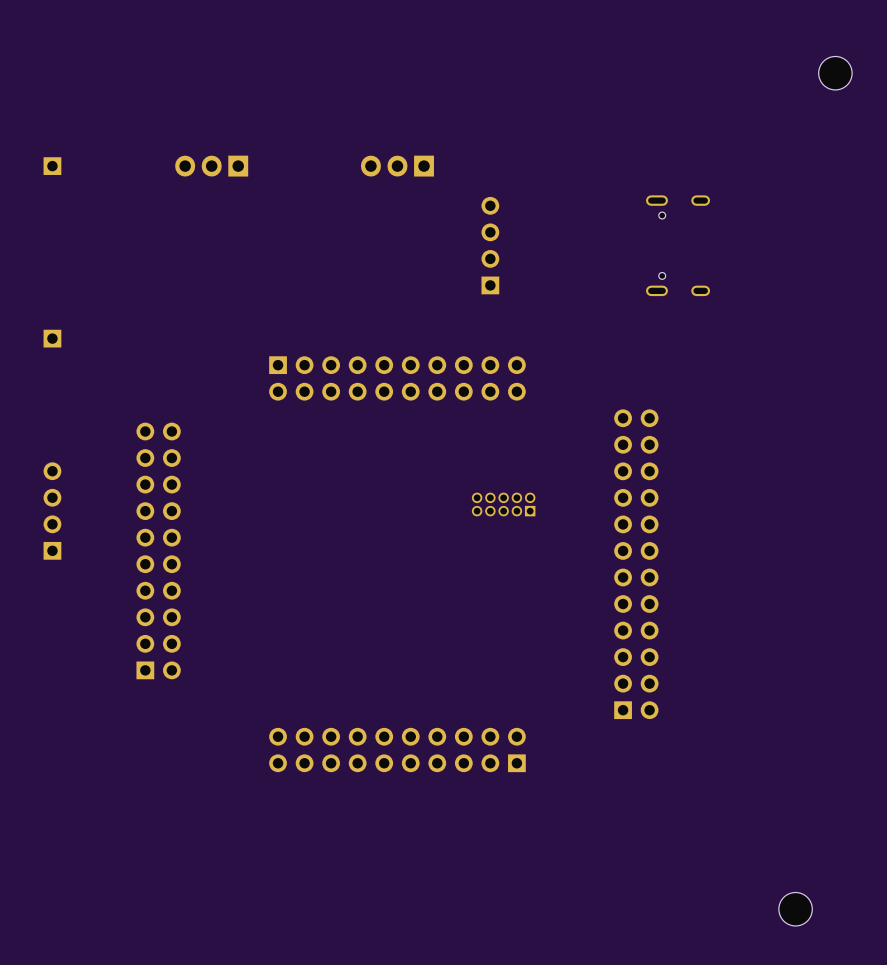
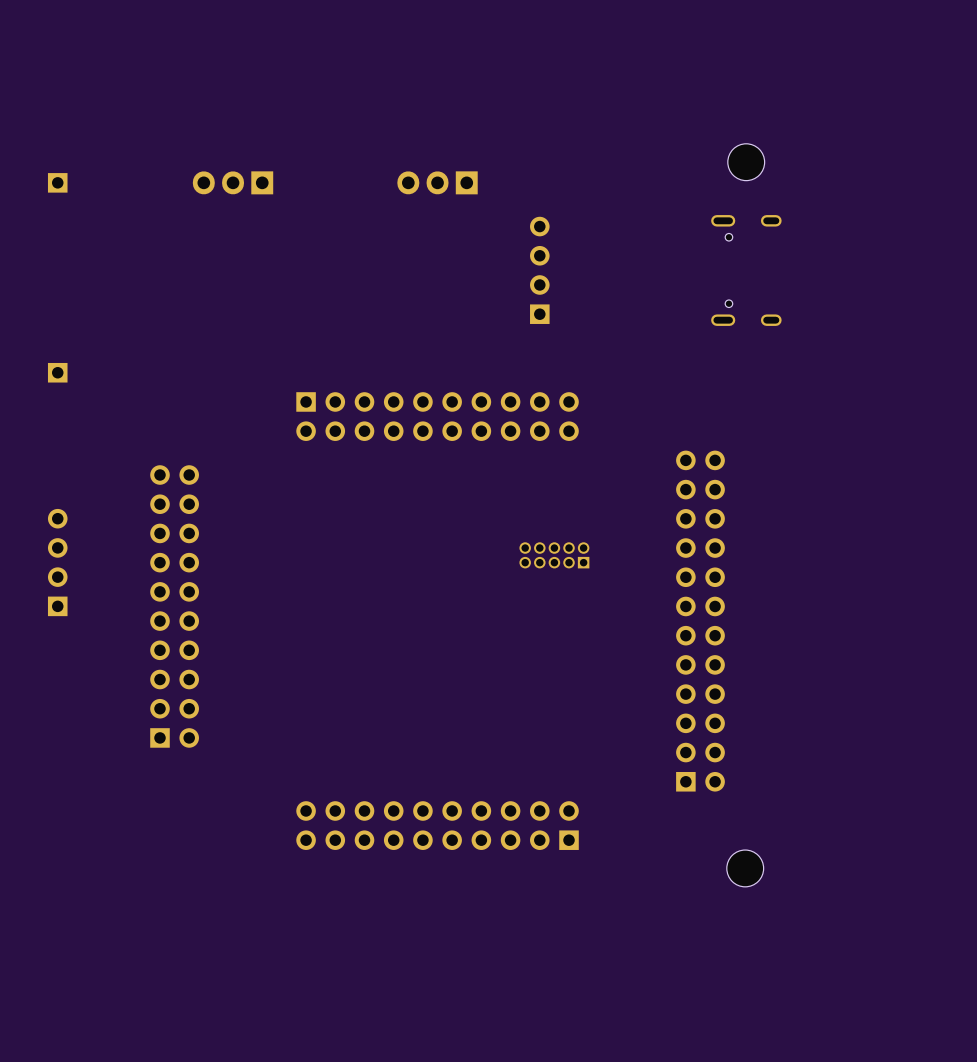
part position: (835, 73) -> (746, 162)
part position: (795, 909) -> (745, 868)

